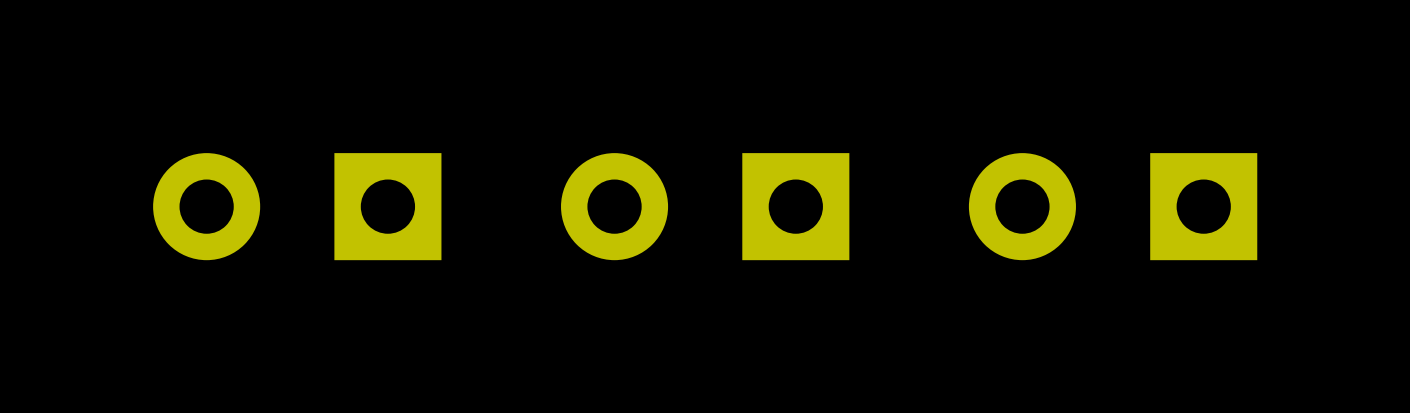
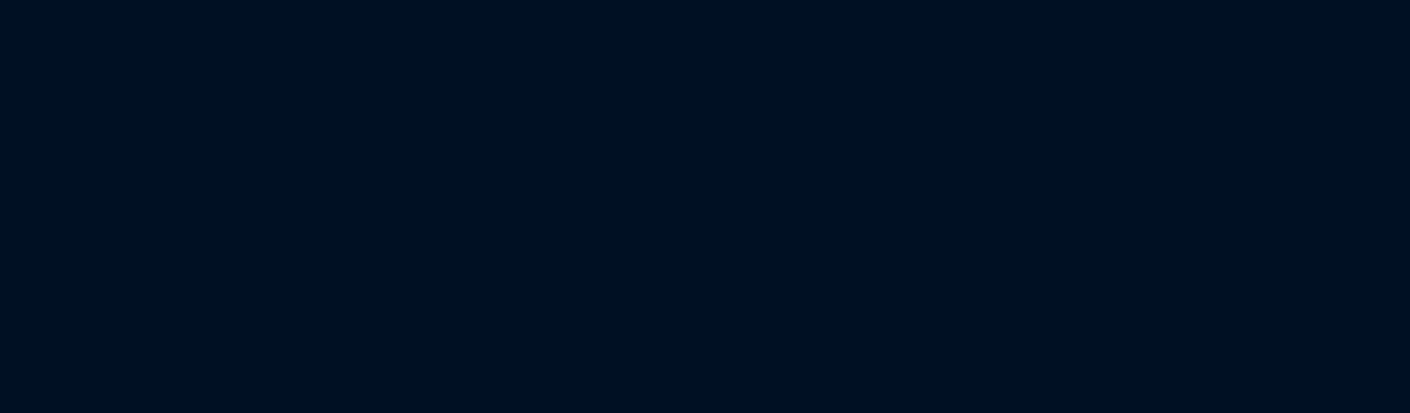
part: (297, 206) -> none
part: (705, 206) -> none
part: (1113, 206) -> none

